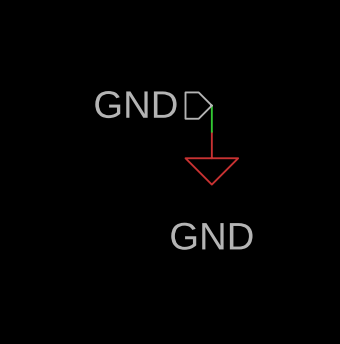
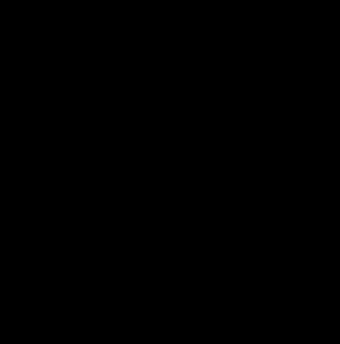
hierarchical label: GND (135, 104) -> none
wire: (211, 105) (211, 131) -> none
power symbol: GND (211, 158) -> none

